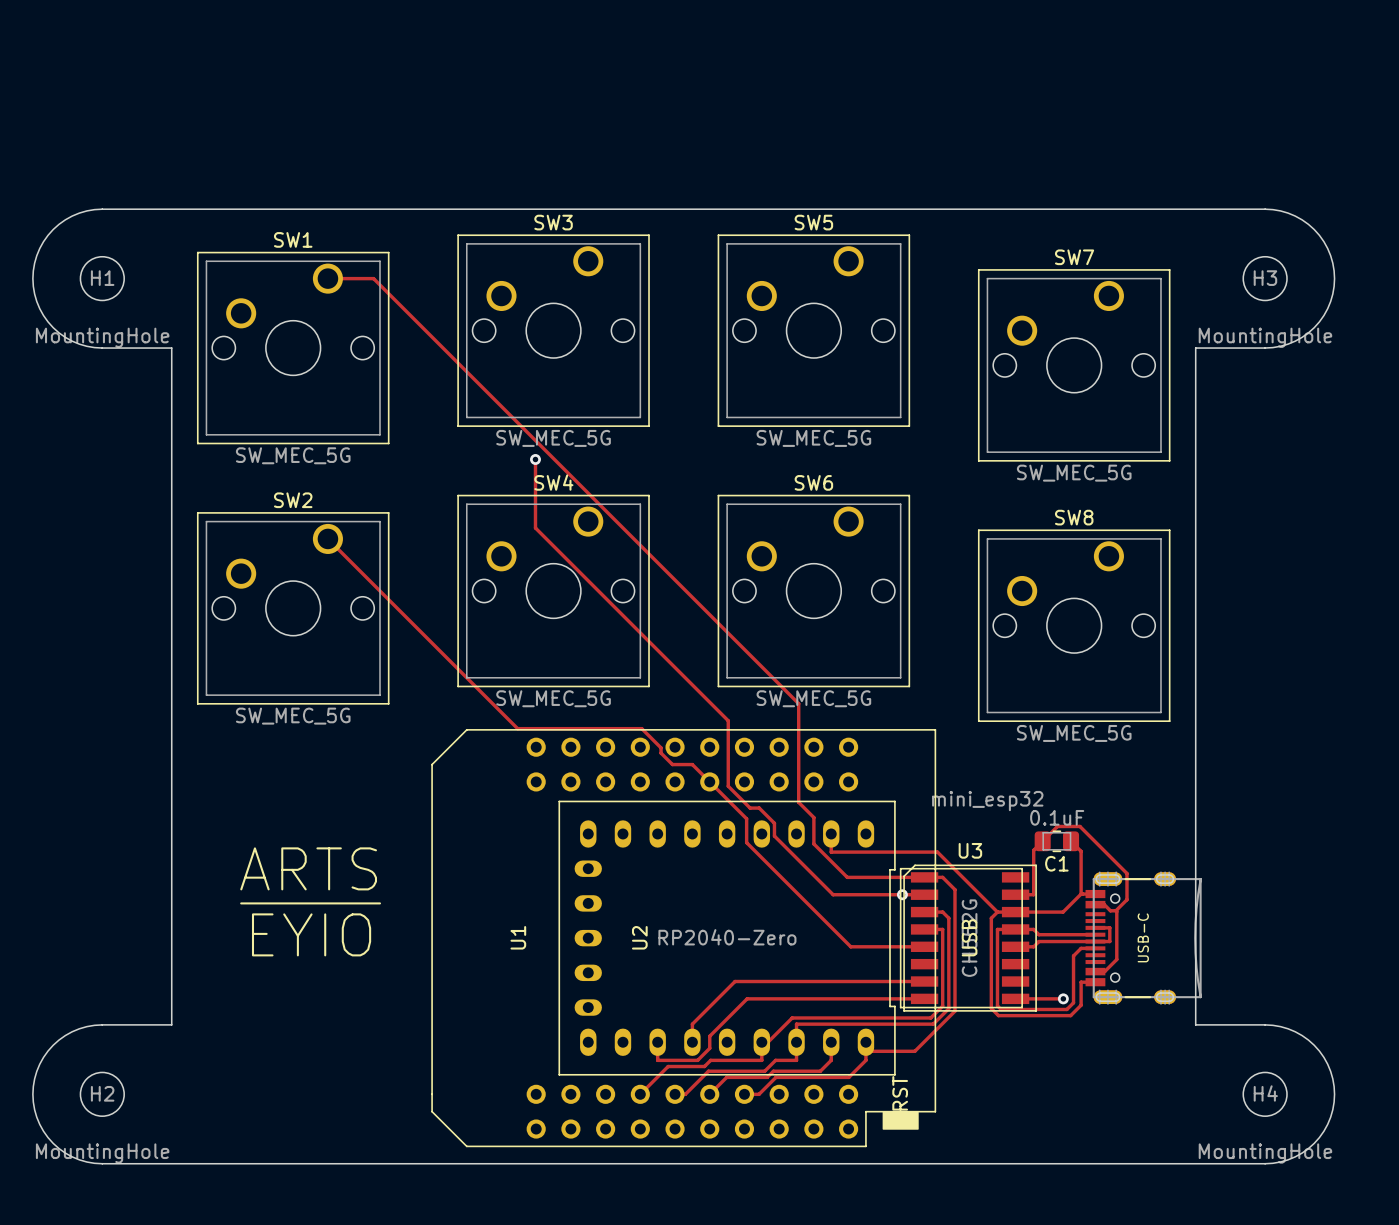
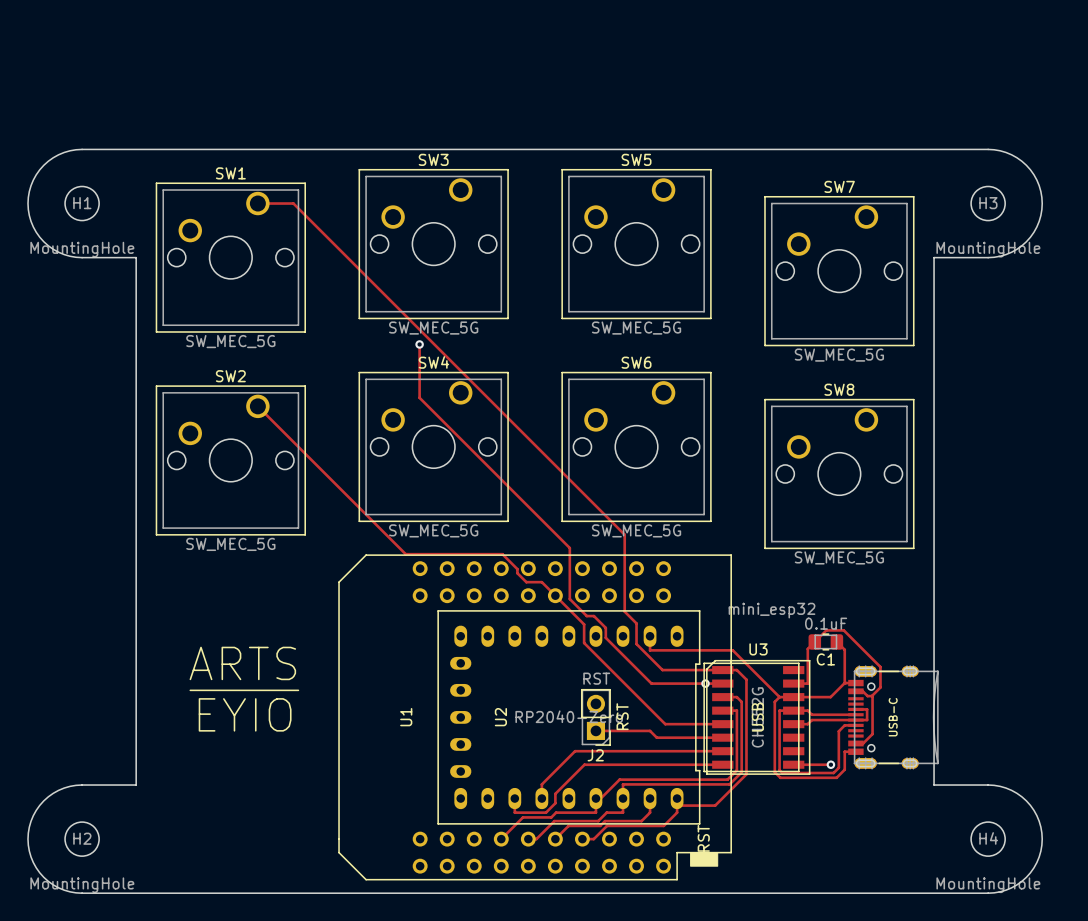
text: none -> RST (622, 716)
J2: none -> RST (595, 717)
track: none -> (595, 730) (650, 730) (656, 737) (722, 737)

